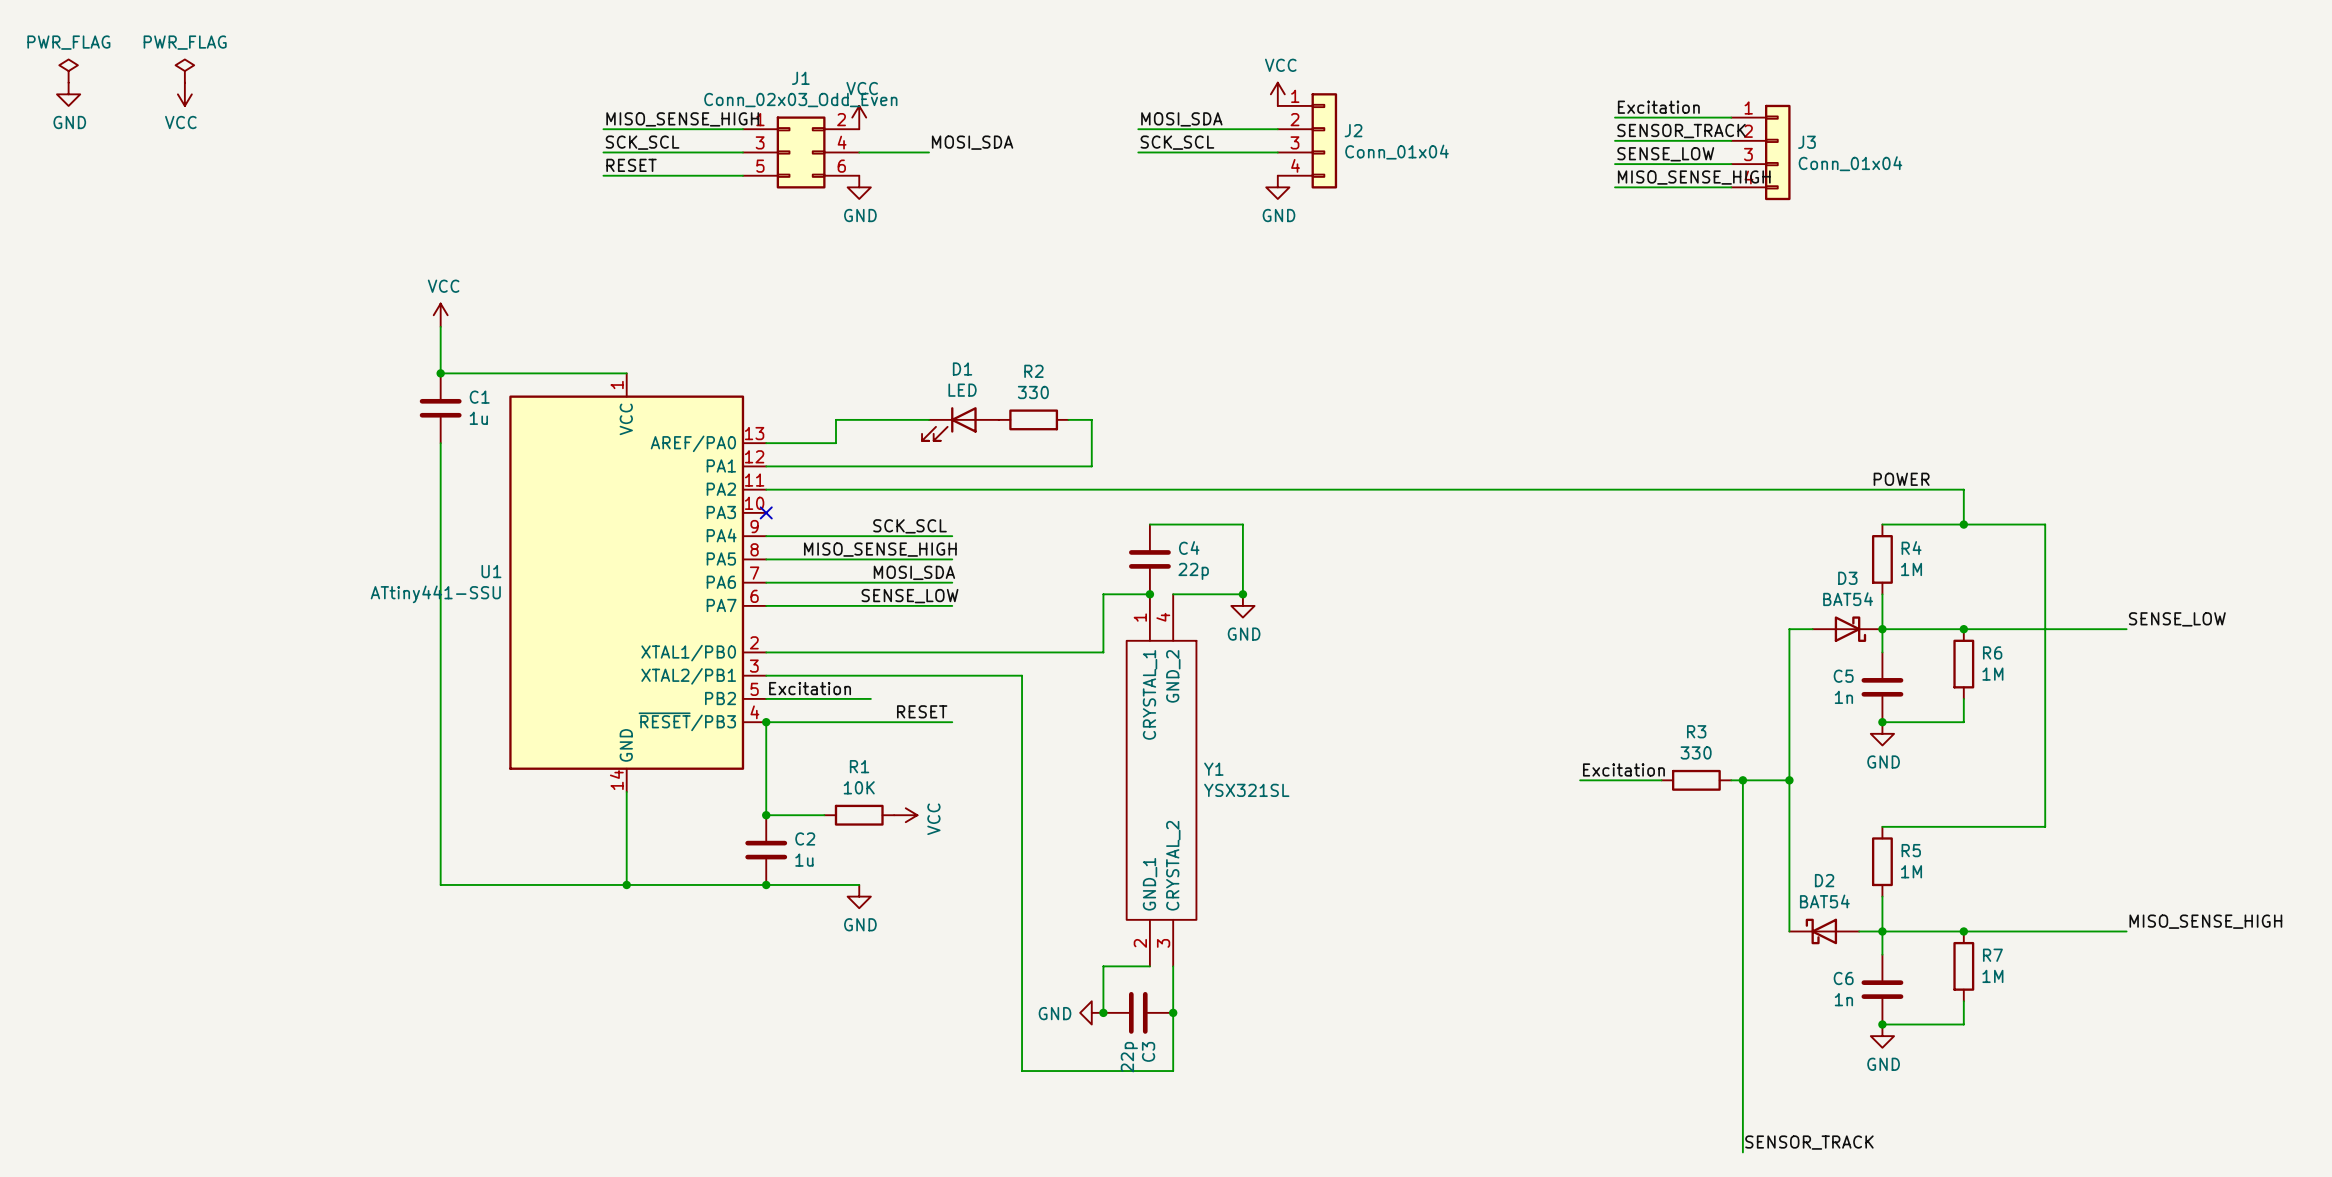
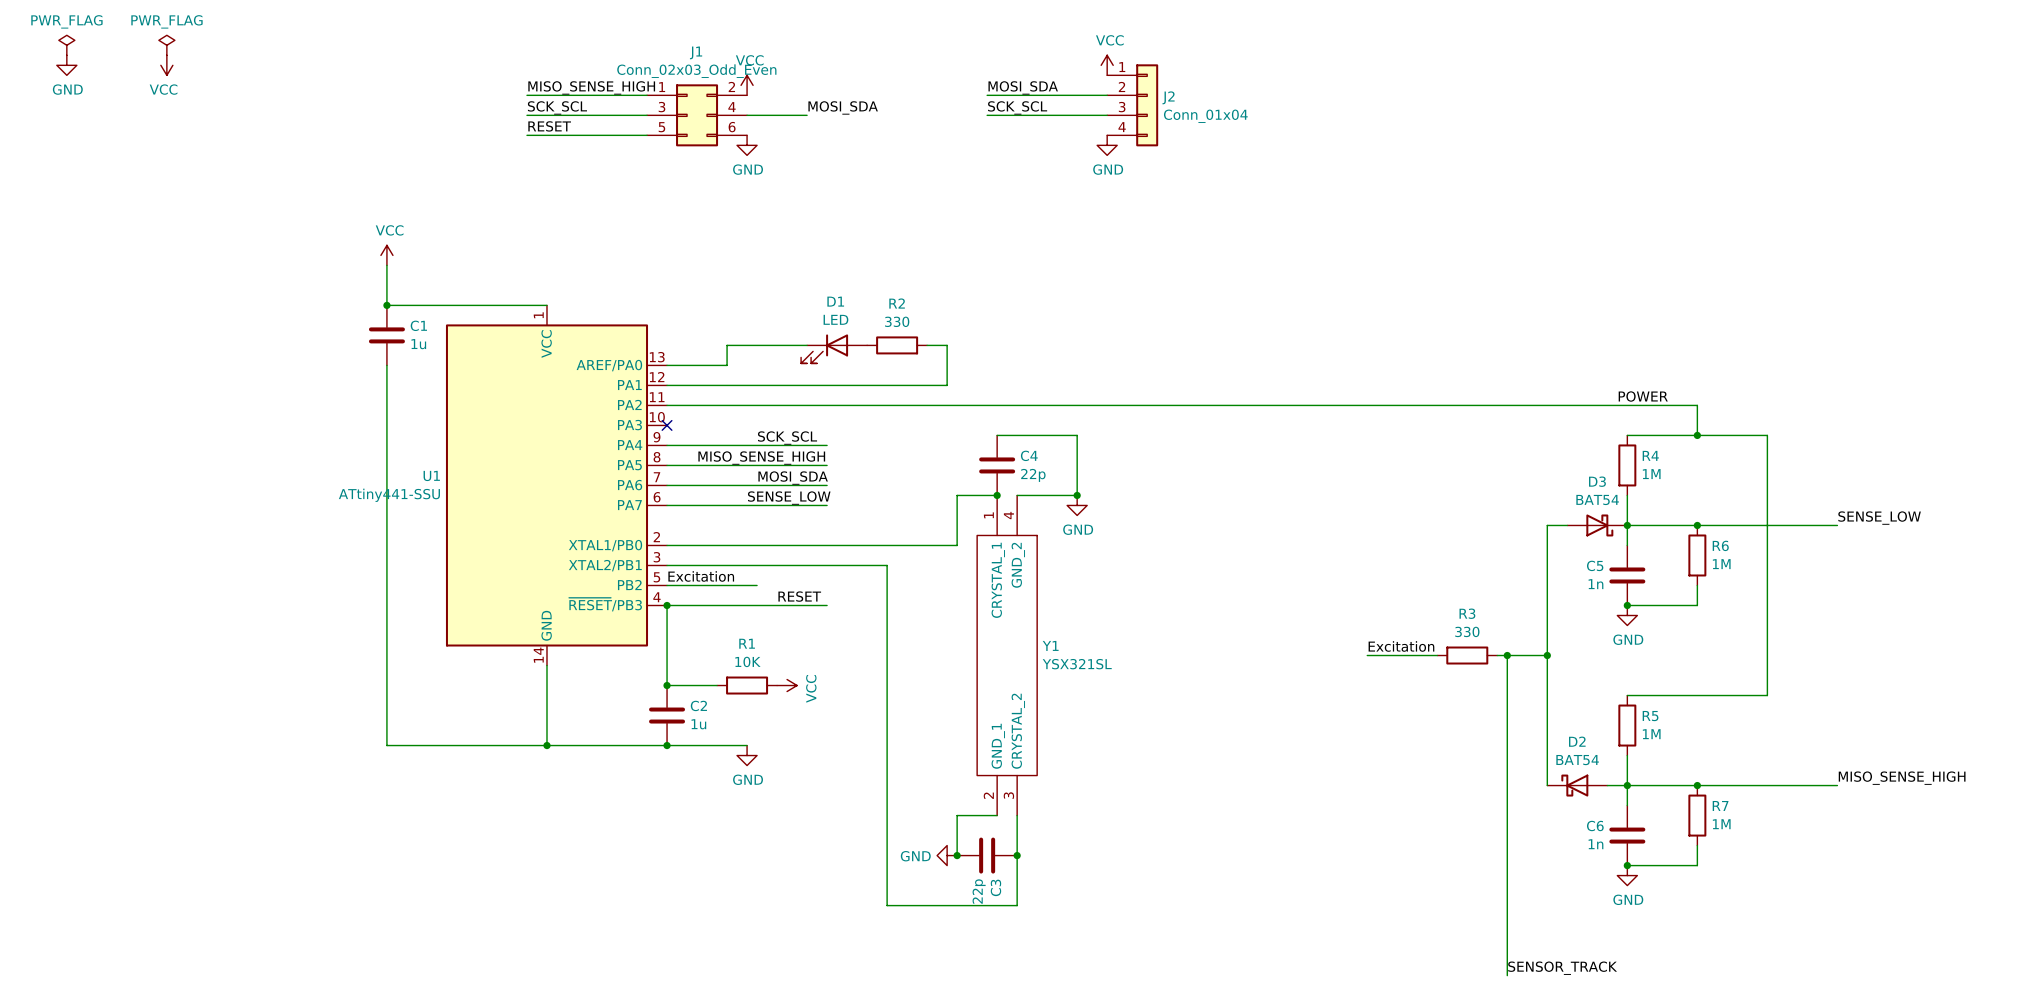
label: Excitation (1658, 107) -> none
wire: (1615, 117) (1731, 117) -> none
label: SENSOR_TRACK (1681, 131) -> none
wire: (1615, 140) (1731, 140) -> none
J3: Conn_01x04 (1760, 152) -> none
label: SENSE_LOW (1665, 154) -> none
wire: (1615, 164) (1731, 164) -> none
label: MISO_SENSE_HIGH (1694, 177) -> none
wire: (1615, 187) (1731, 187) -> none

